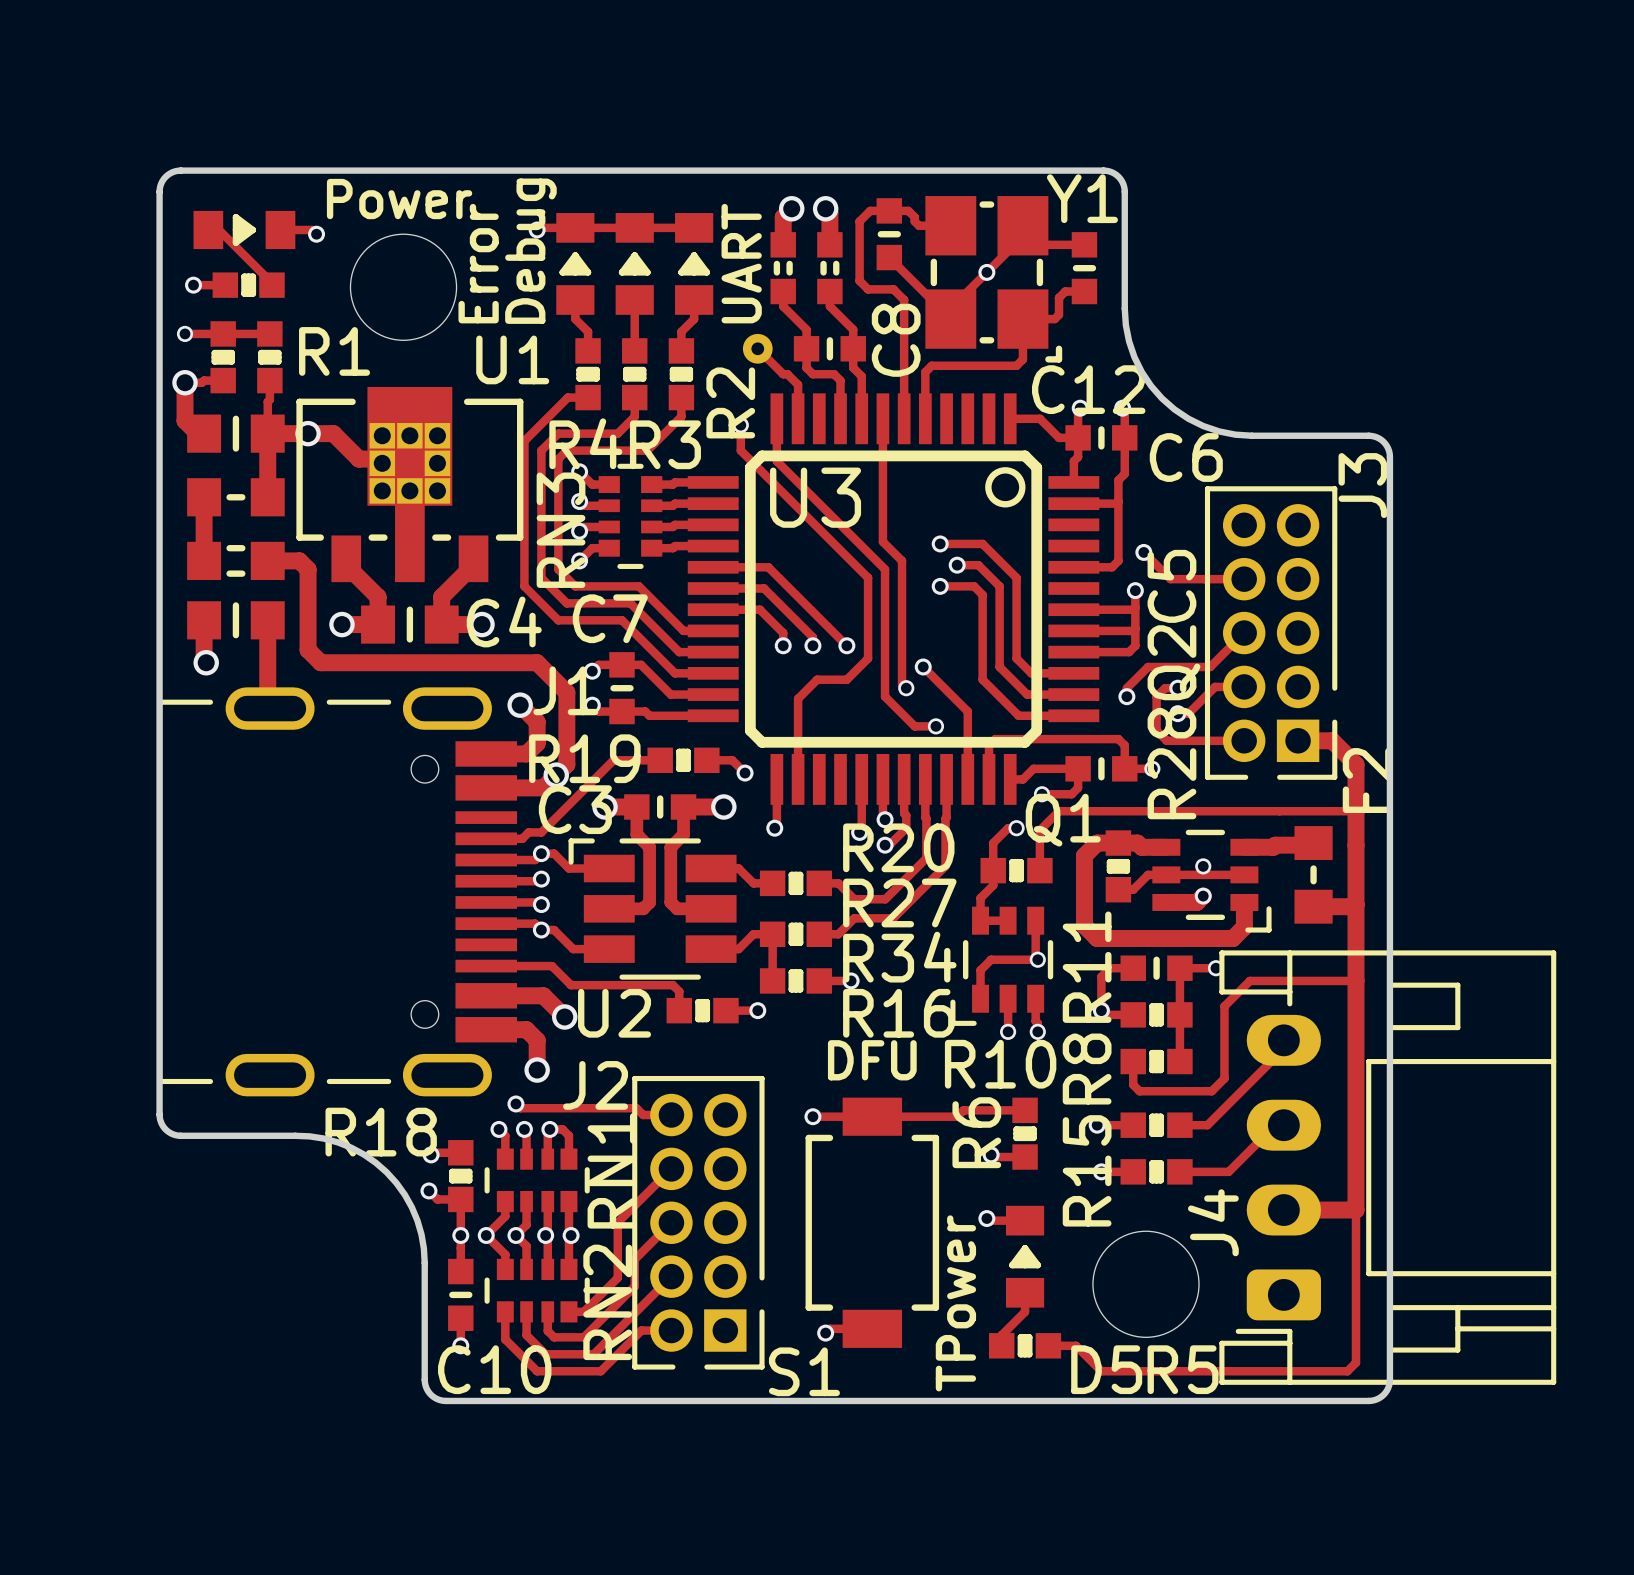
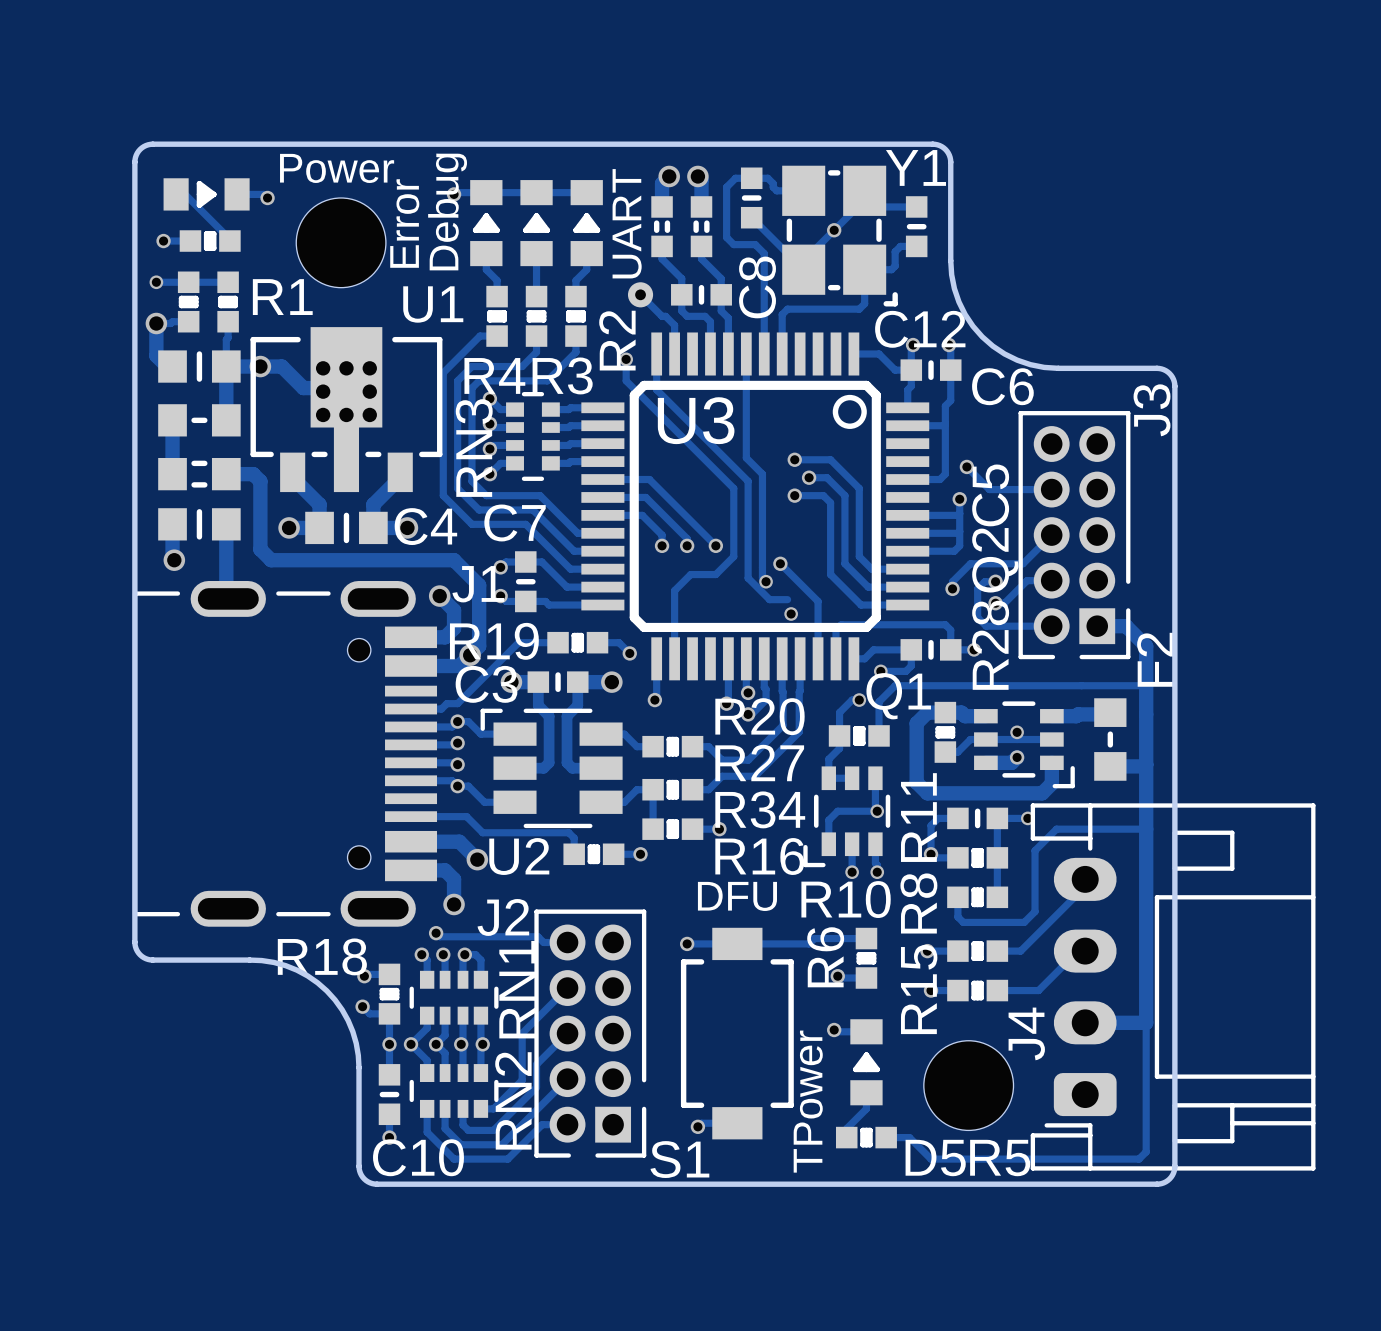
track: (885, 683) (885, 696) (914, 726) (935, 726) -> (748, 578) (769, 599) (787, 599)

